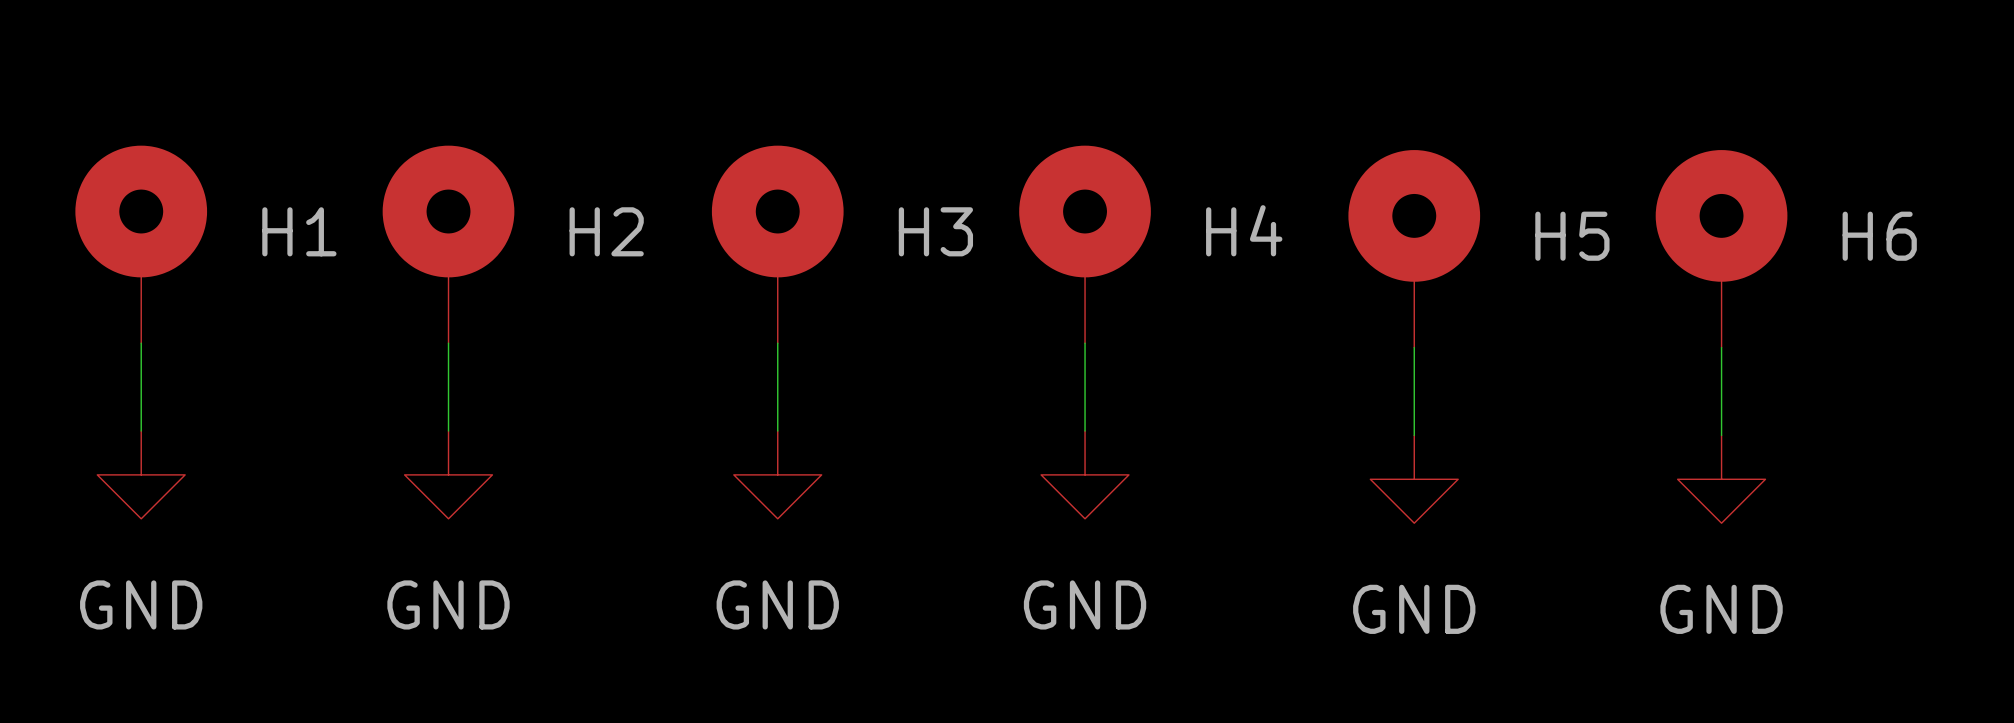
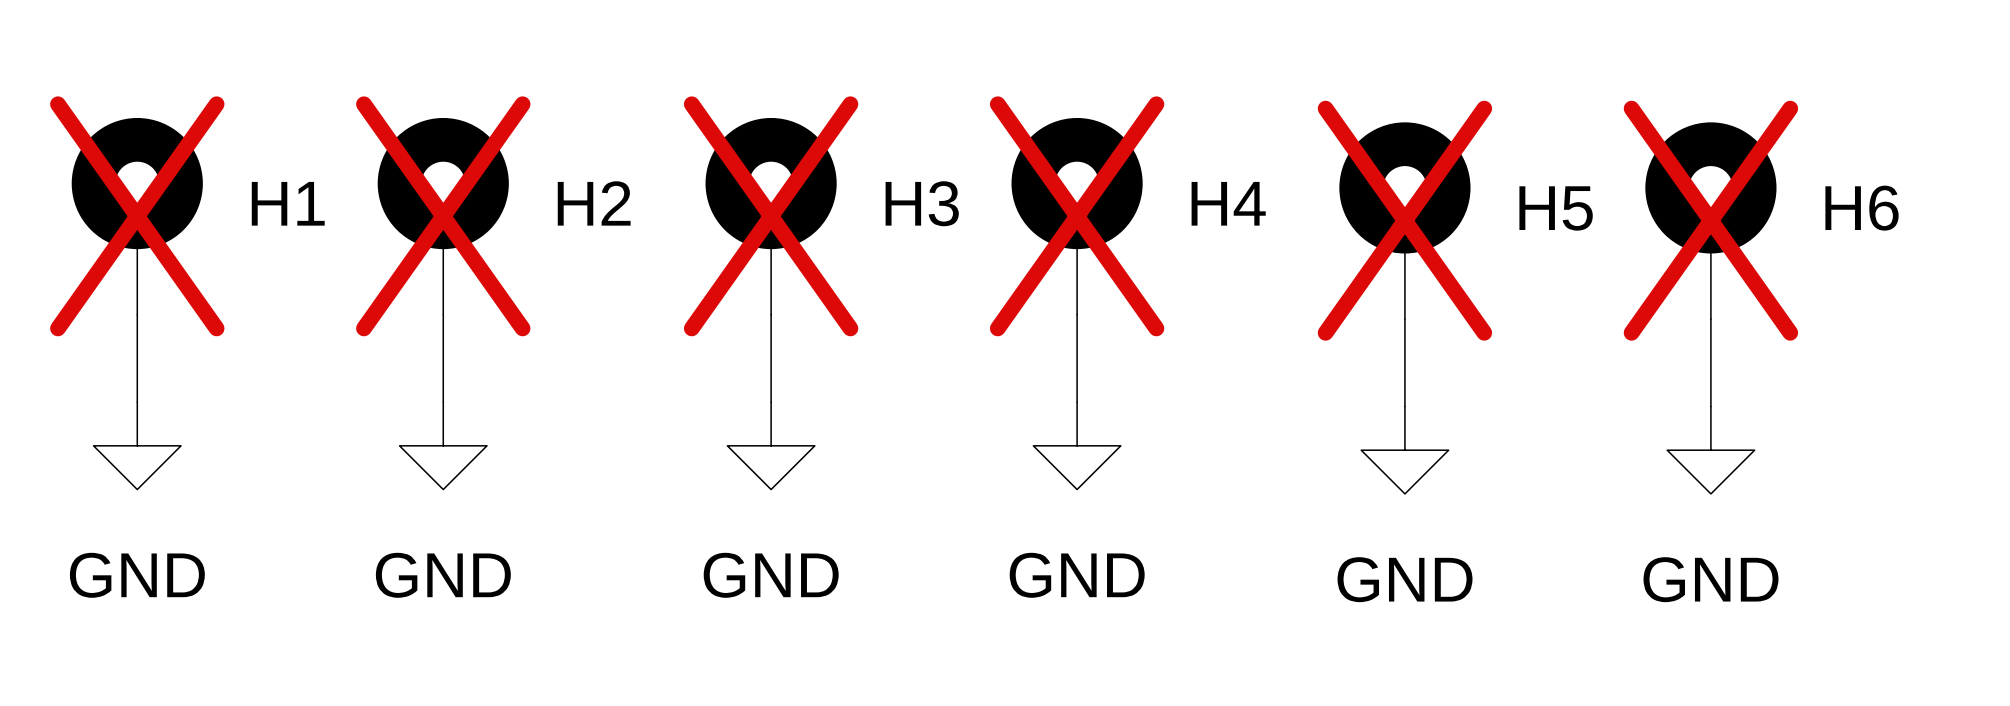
H1 do-not-place cross: none -> (137, 216)
H2 do-not-place cross: none -> (443, 216)
H3 do-not-place cross: none -> (771, 216)
H4 do-not-place cross: none -> (1077, 216)
H5 do-not-place cross: none -> (1404, 220)
H6 do-not-place cross: none -> (1710, 220)

